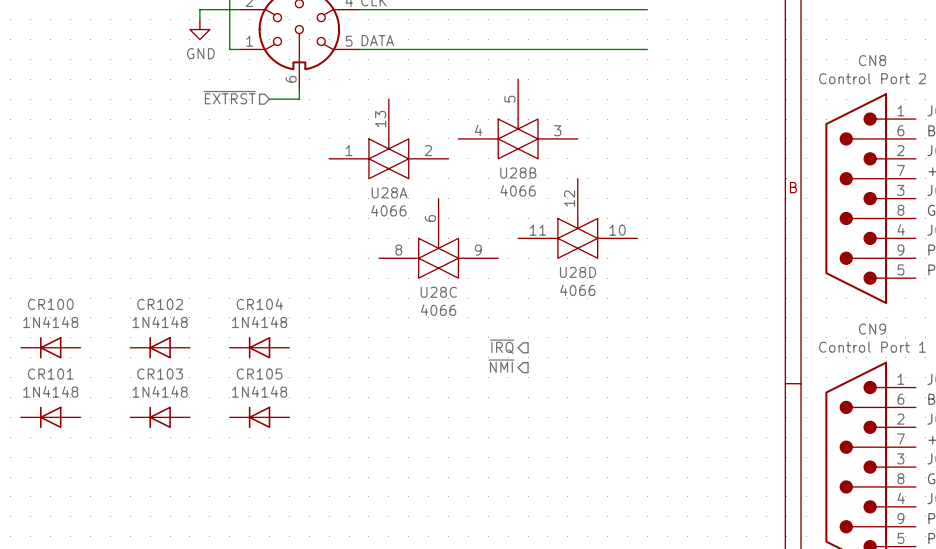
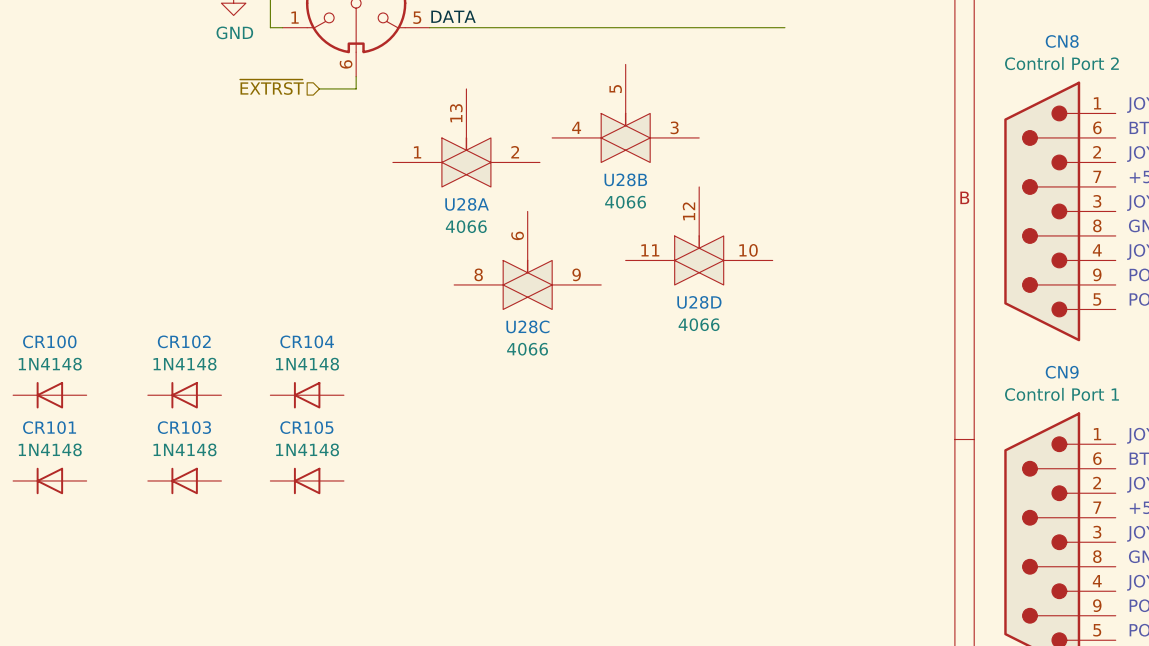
hierarchical label: ~{IRQ} (502, 346) -> none
hierarchical label: ~{NMI} (501, 366) -> none

